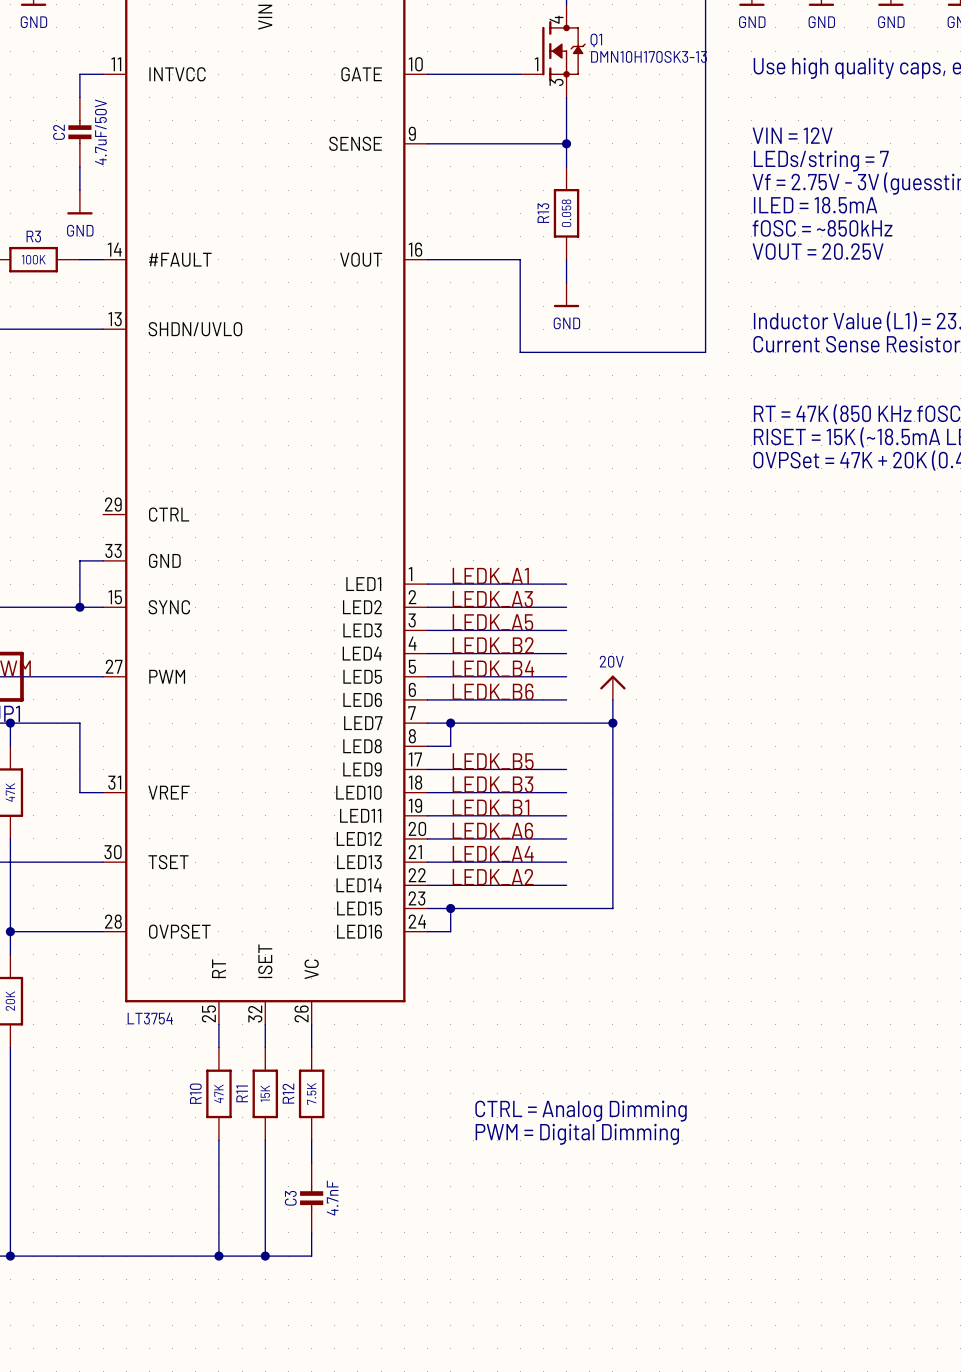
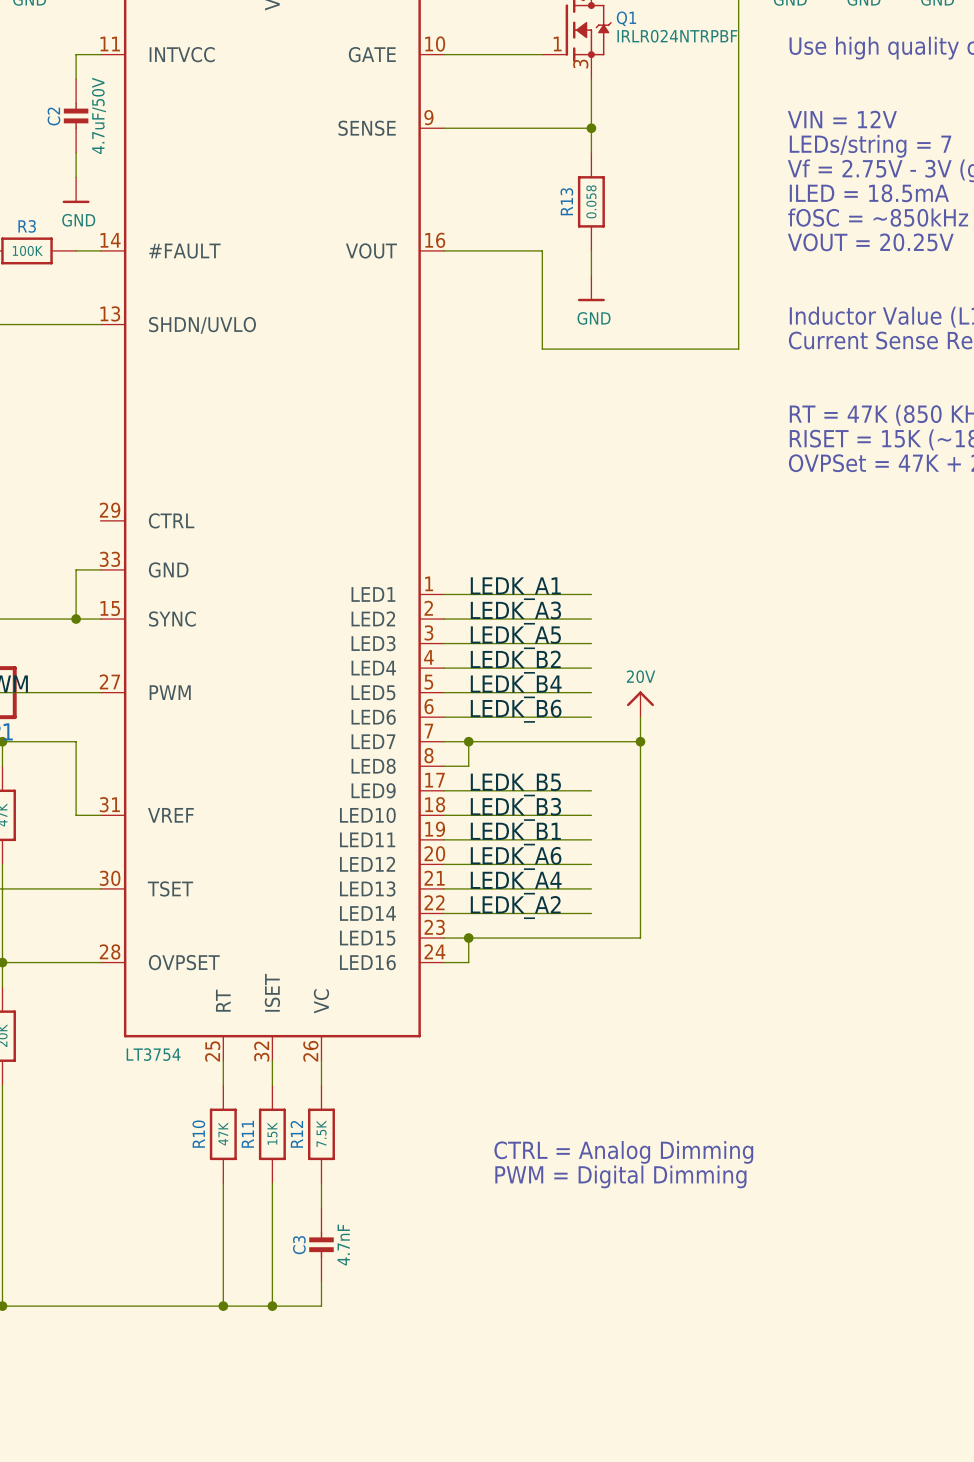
Q1 value: DMN10H170SK3-13 (649, 56) -> IRLR024NTRPBF (677, 36)

